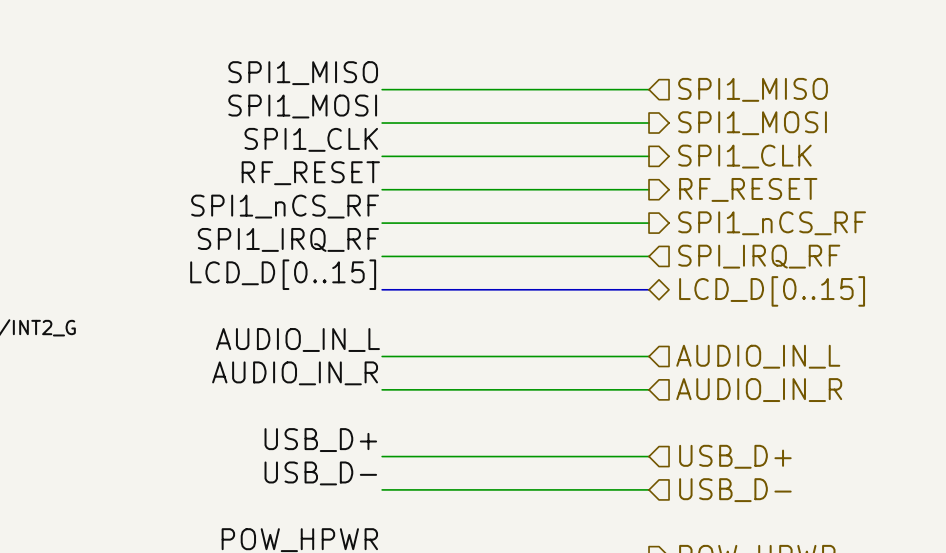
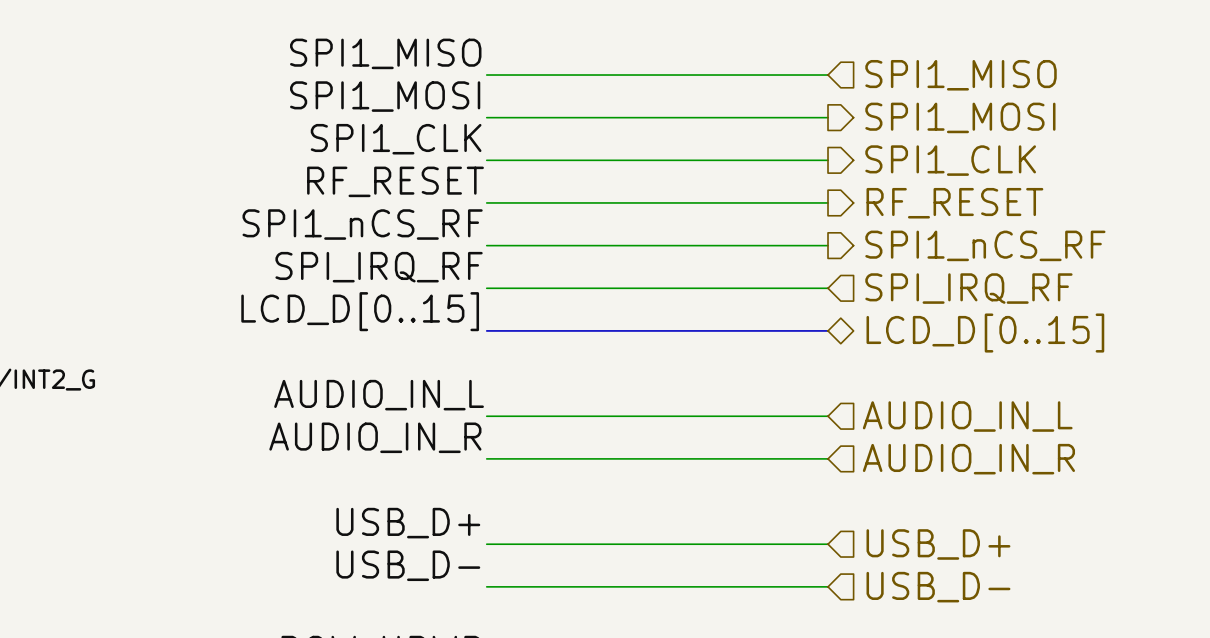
label: SPI1_IRQ_RF (288, 239) -> SPI_IRQ_RF (379, 267)

